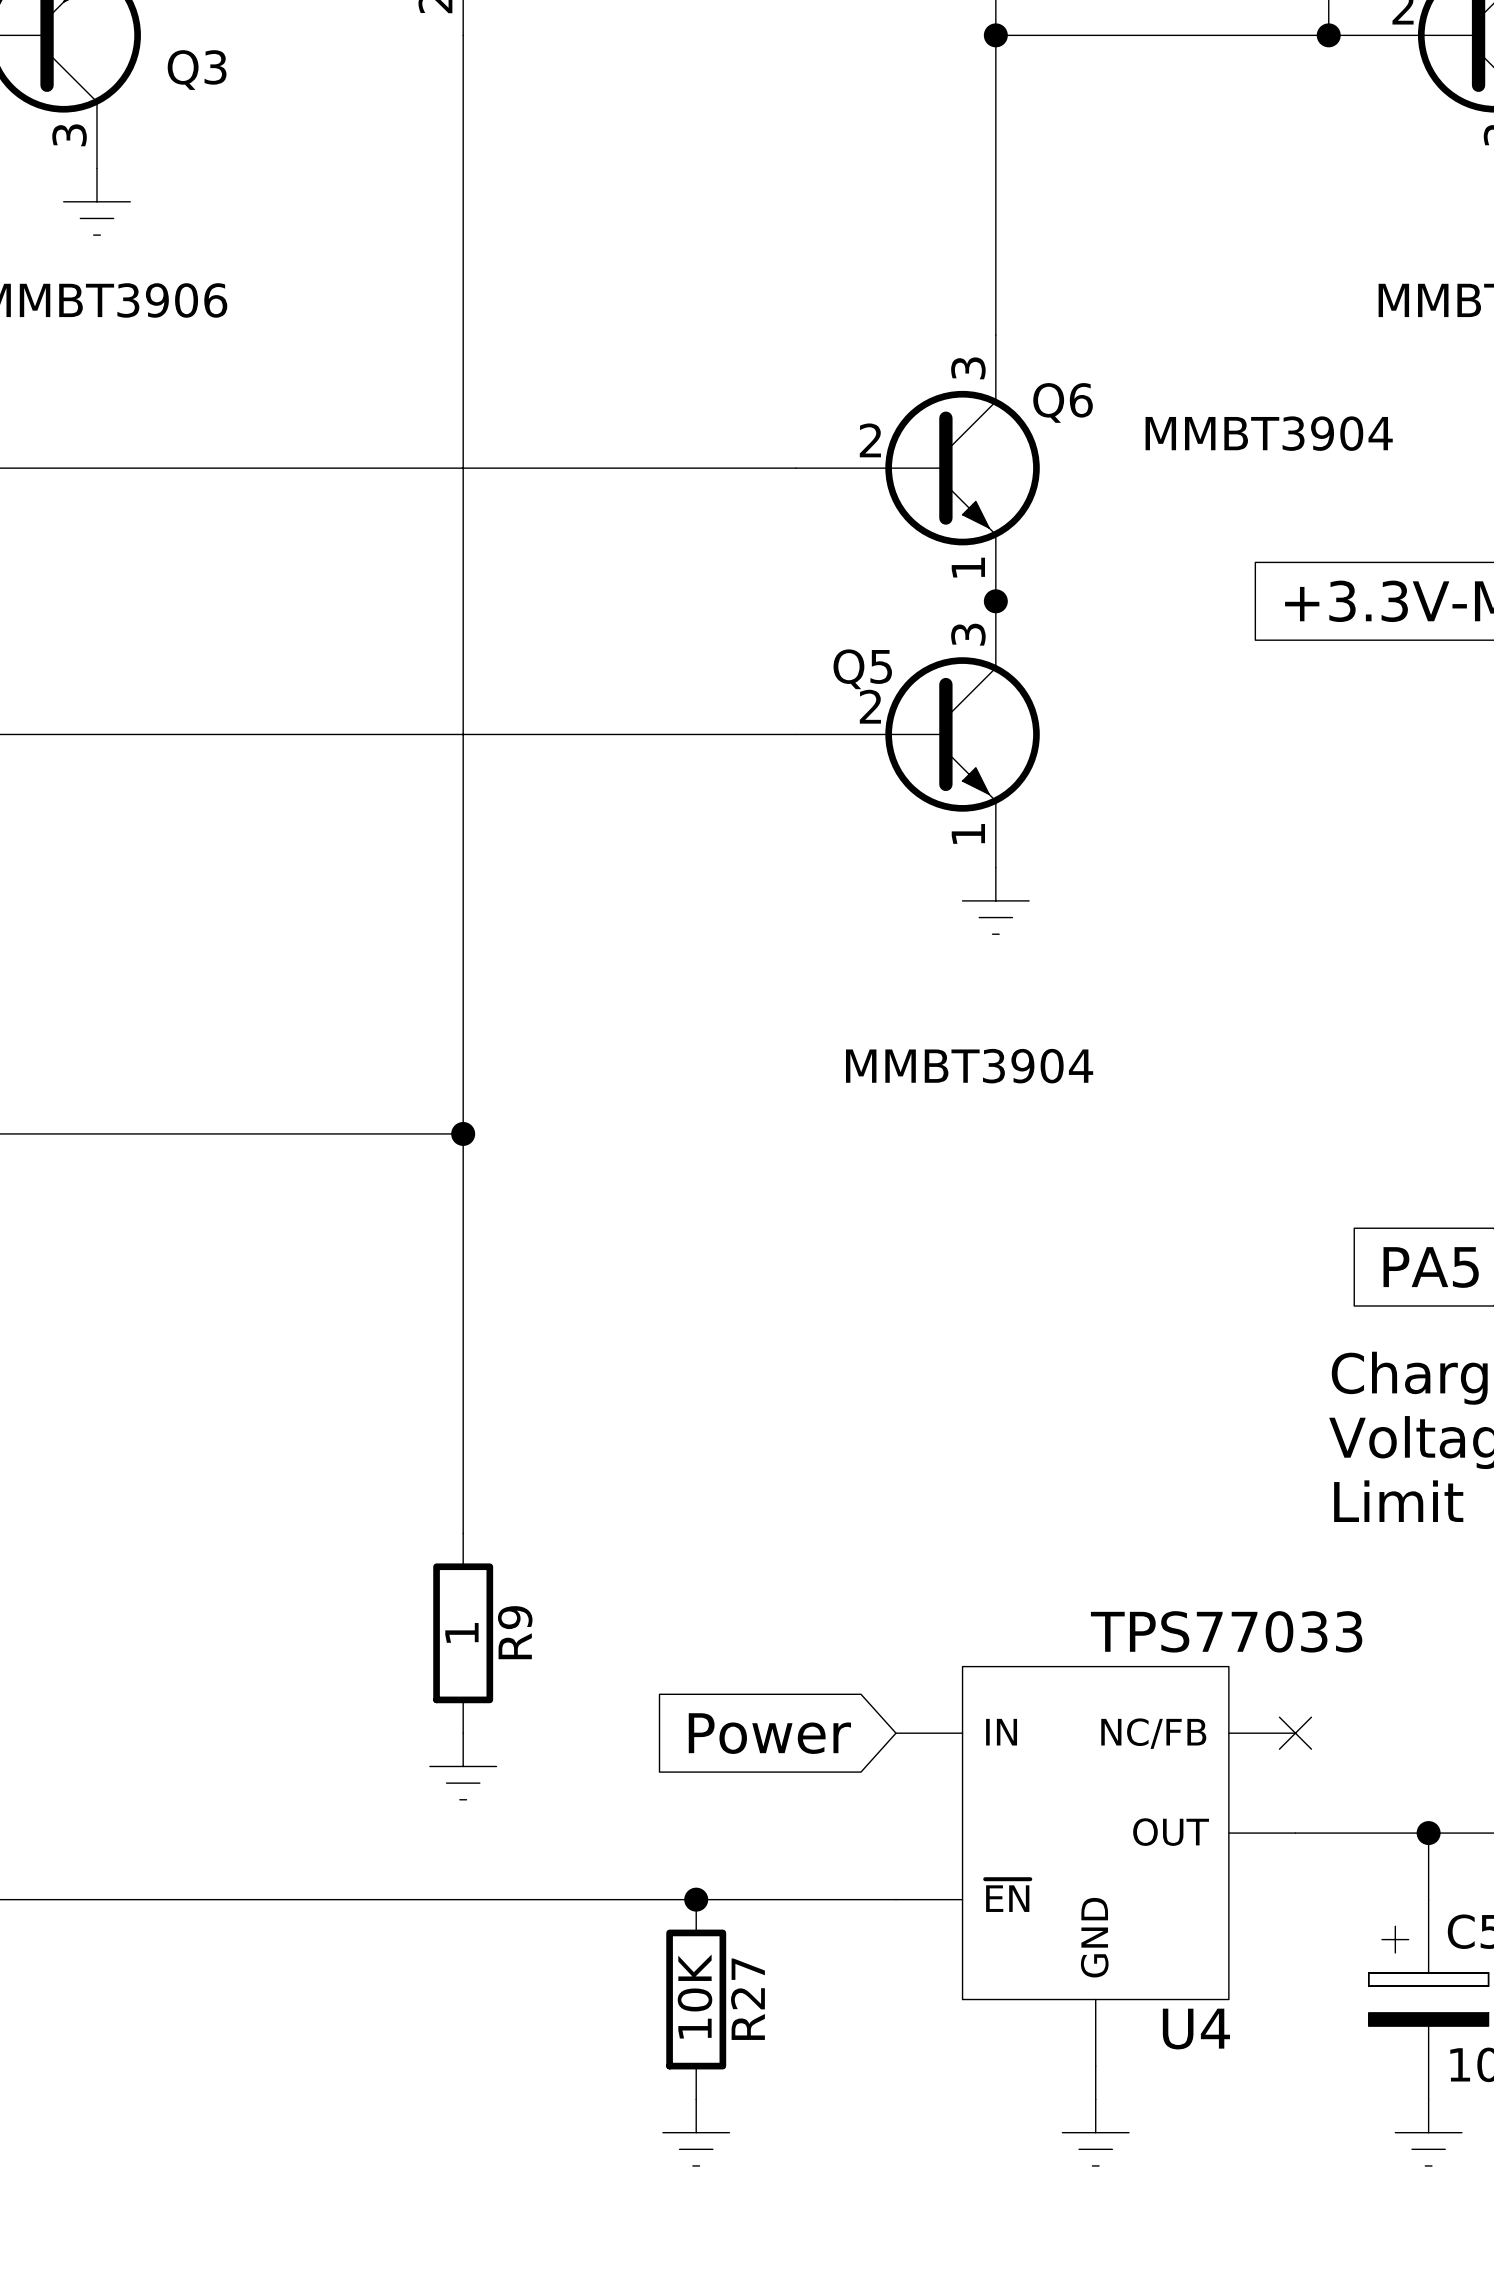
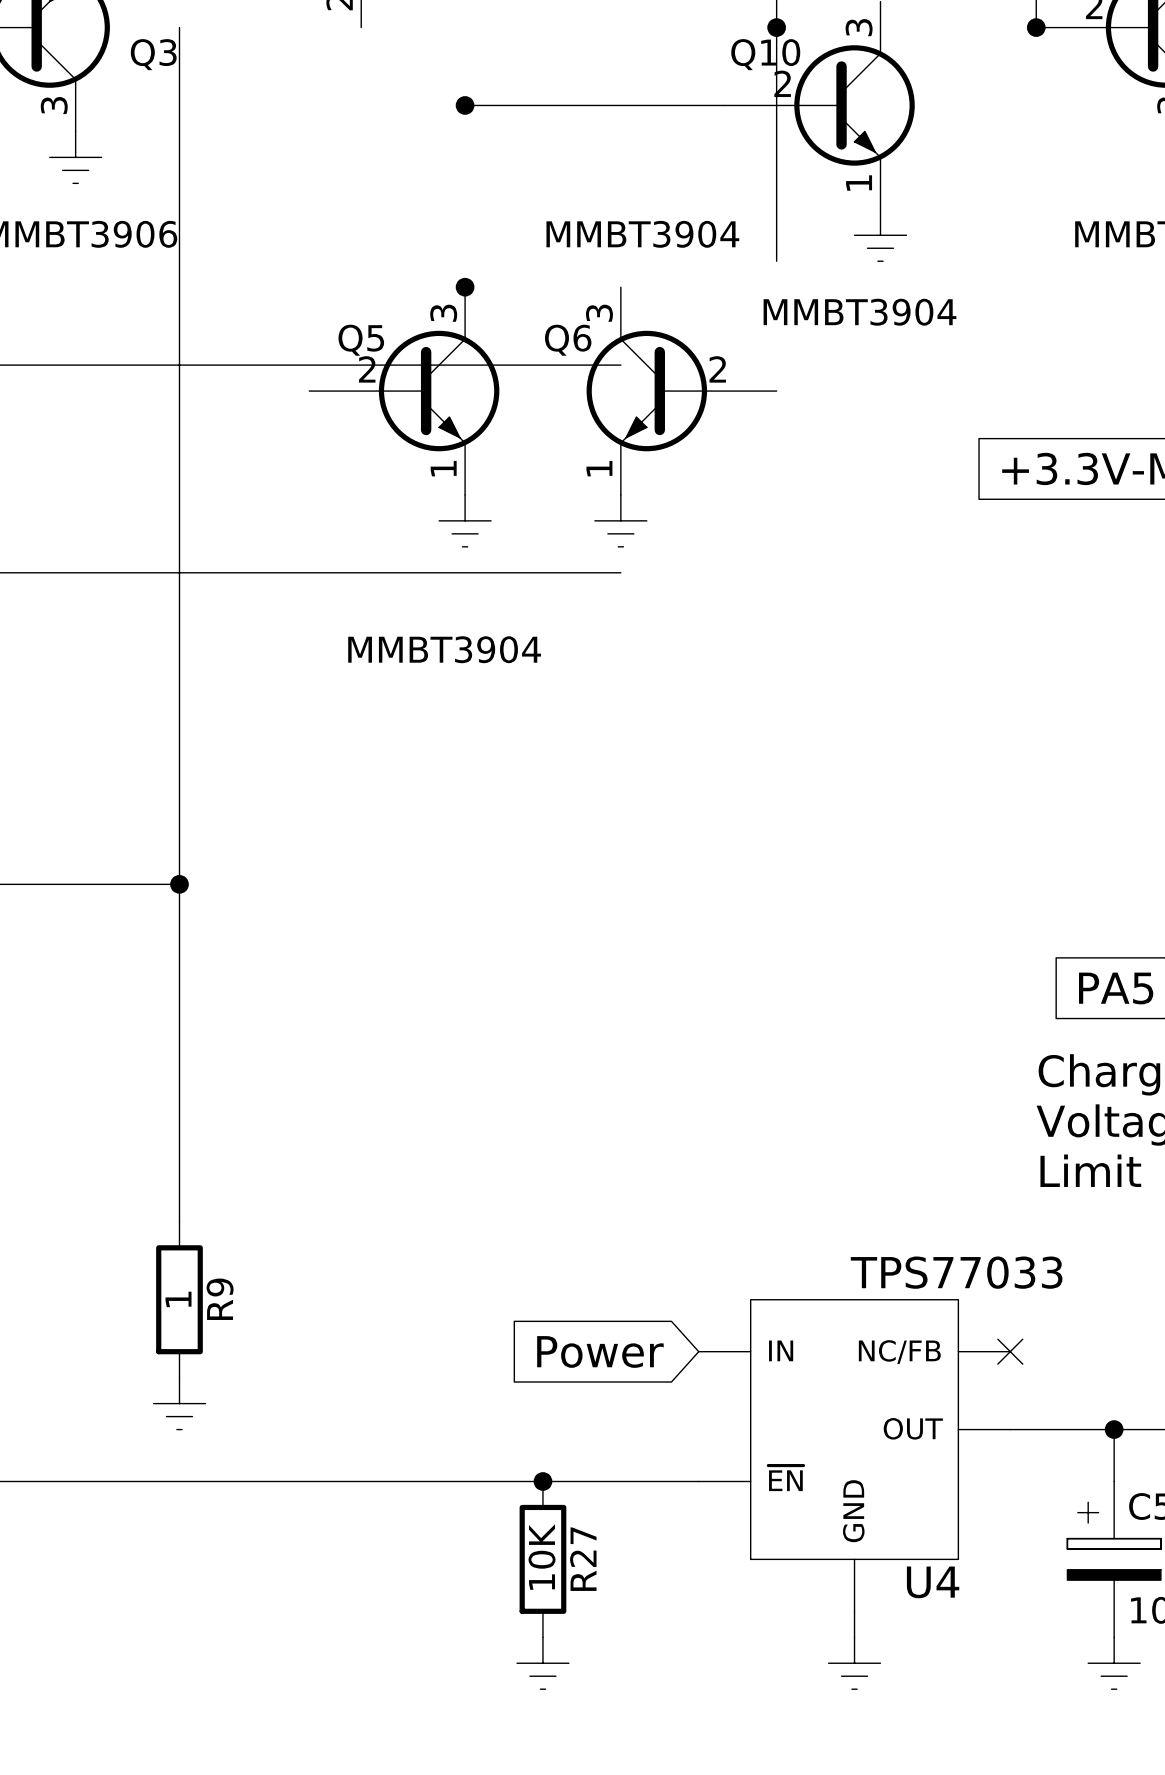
wire: none -> (179, 27) (179, 1221)
wire: (463, 35) (463, 1533) -> none
wire: (995, 35) (1328, 35) -> (465, 105) (724, 105)
junction: none -> (465, 105)
Q10: none -> MMBT3904 (819, 105)
power symbol: none -> (880, 235)
junction: none -> (465, 287)
Q6 value position: MMBT3904 (1269, 433) -> MMBT3904 (642, 234)
Q6 flip: as is (962, 468) -> left-right (646, 391)
junction: (995, 601) -> none
power symbol: none -> (465, 520)
power symbol: none -> (620, 520)
Q5 position: (917, 734) -> (404, 391)
power symbol: (995, 900) -> none
wire: (230, 1133) (463, 1133) -> none
junction: none -> (179, 884)
junction: (463, 1133) -> none
R9 position: (463, 1633) -> (179, 1299)
power symbol position: (463, 1766) -> (179, 1403)

